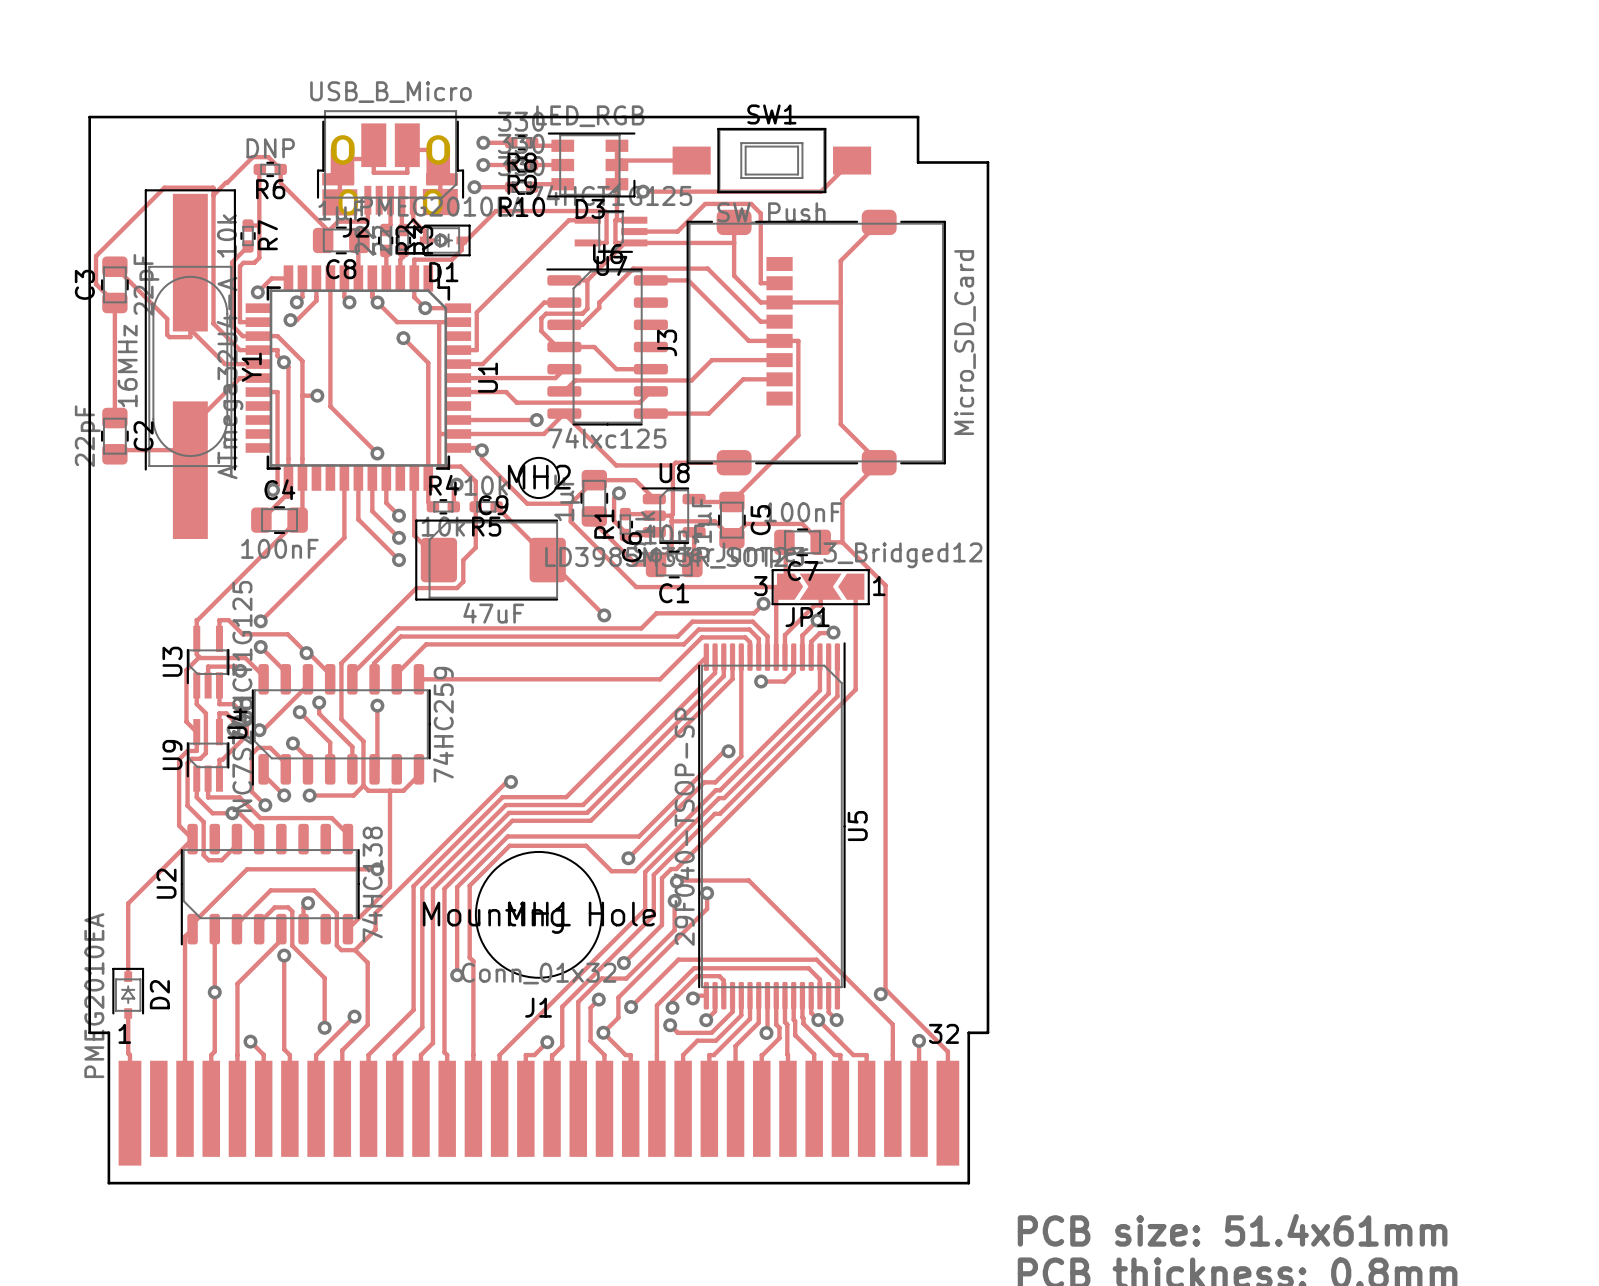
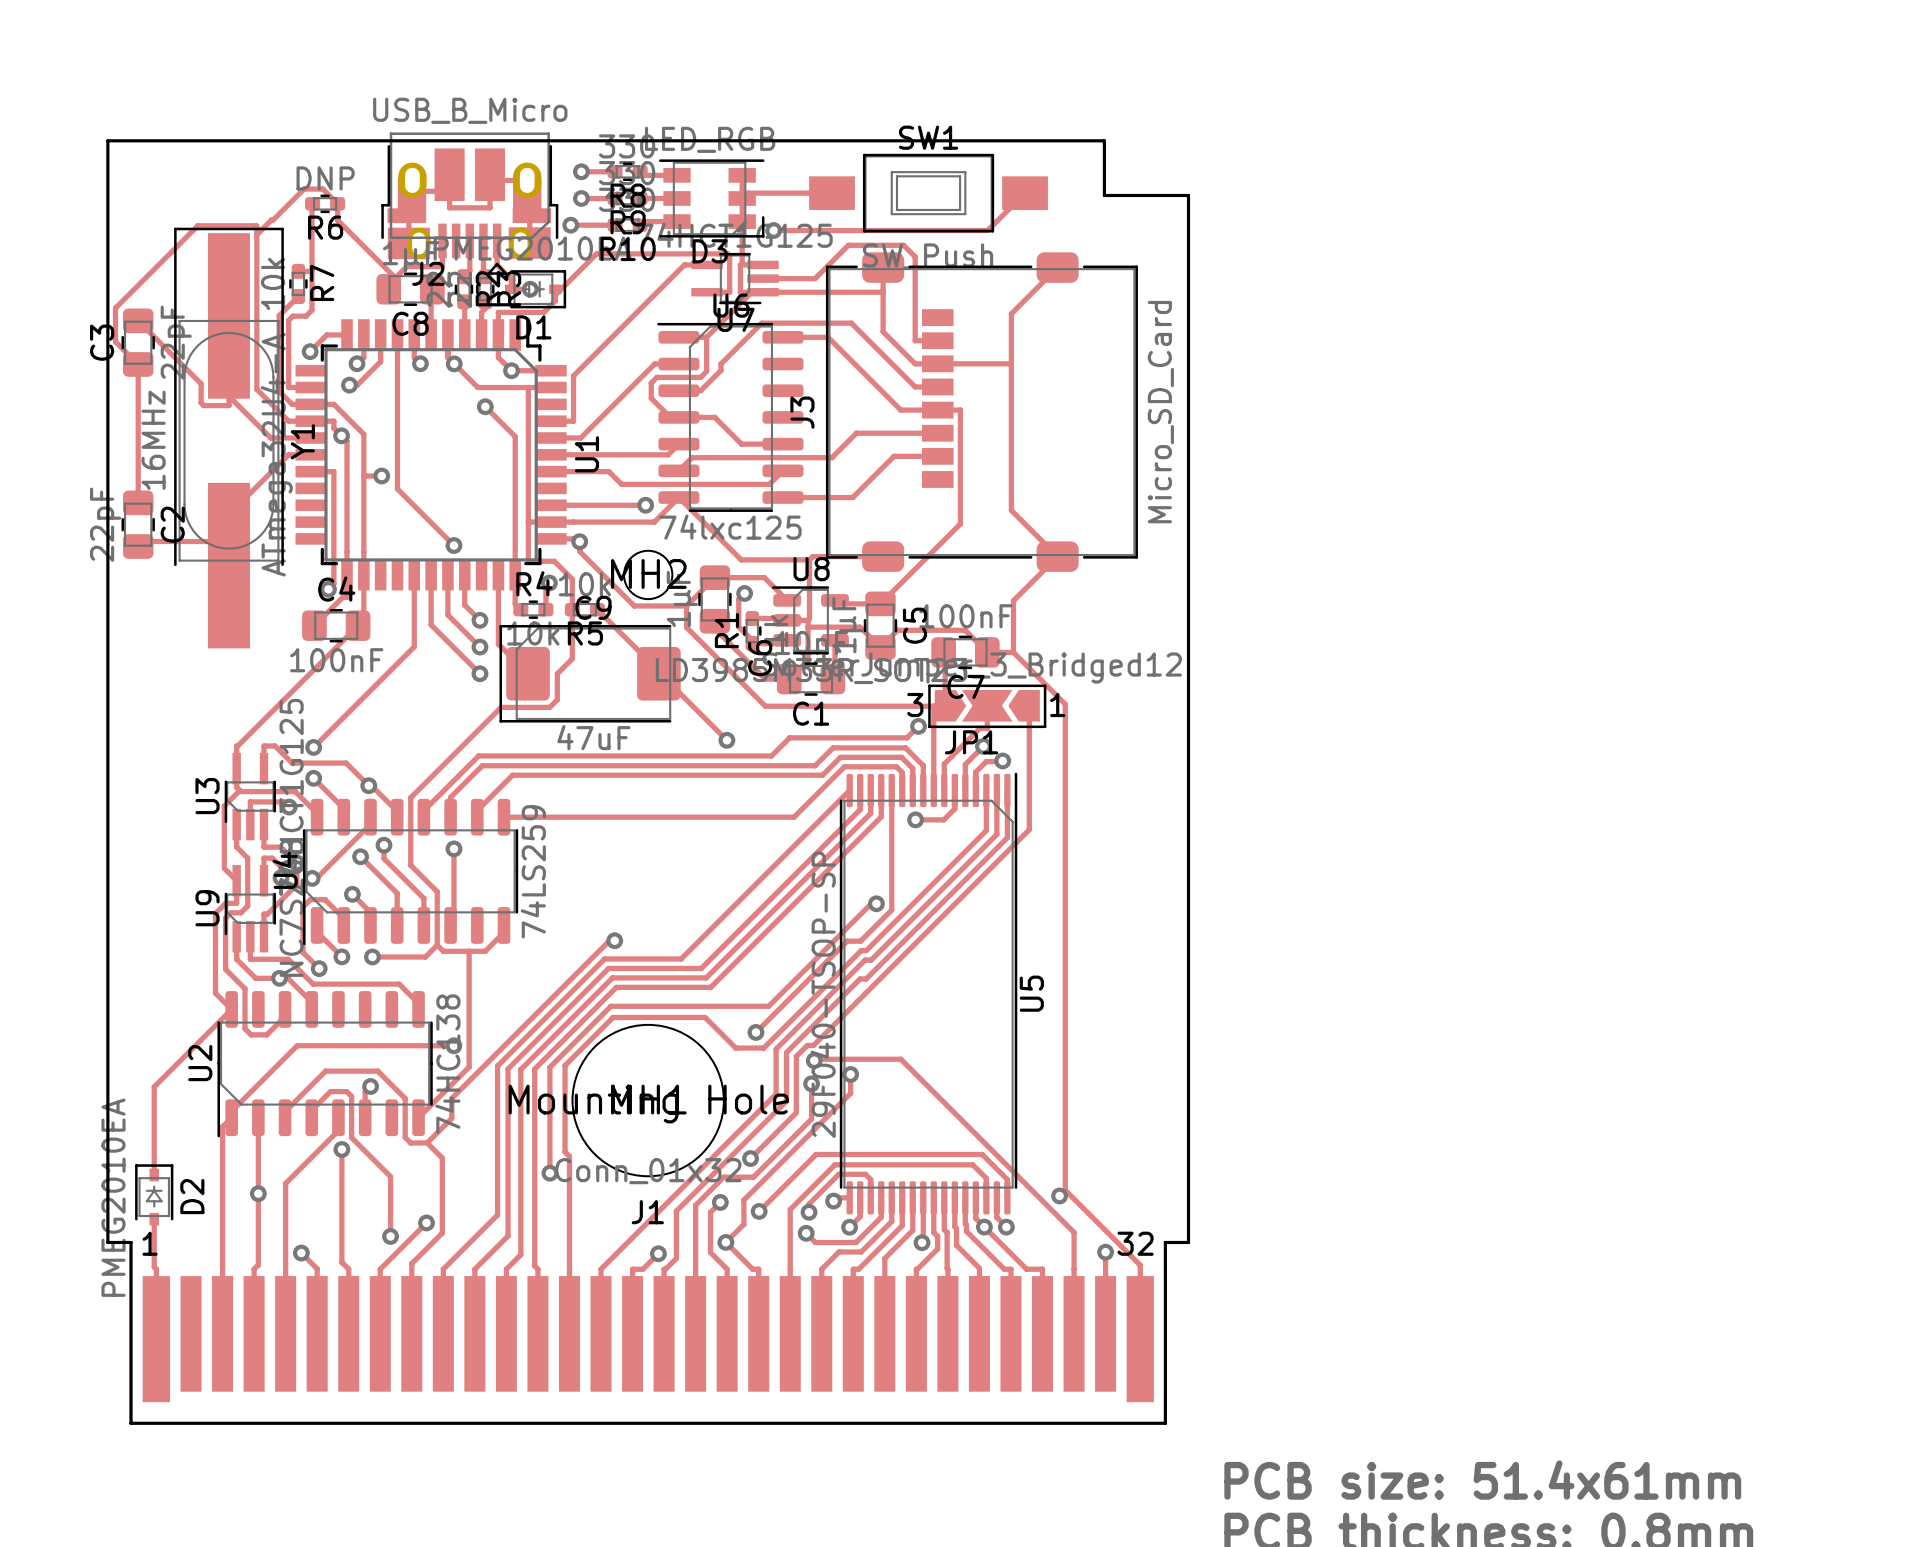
U4 value: 74HC259 (443, 724) -> 74LS259 (533, 871)

